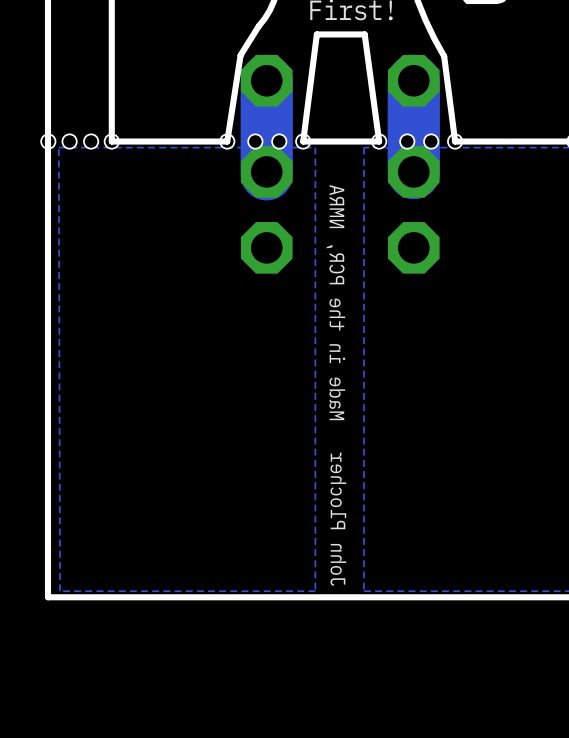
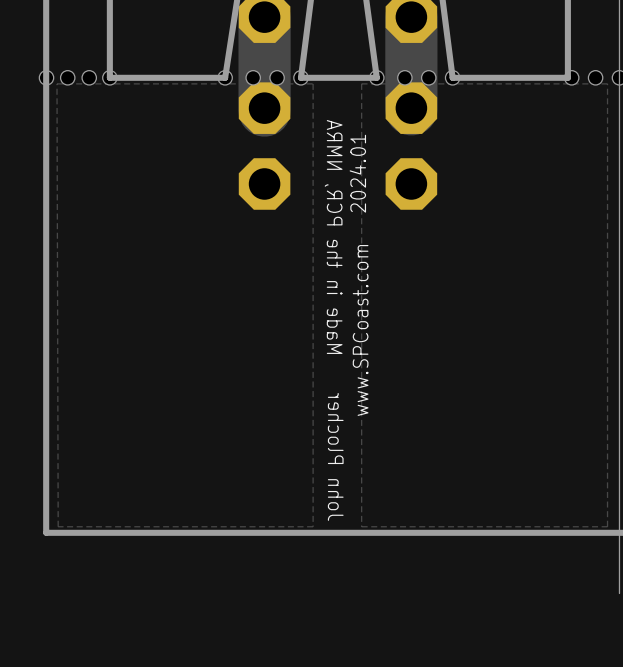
text: none -> 2024.01 (357, 173)
text: none -> www.SPCoast.com (360, 330)

